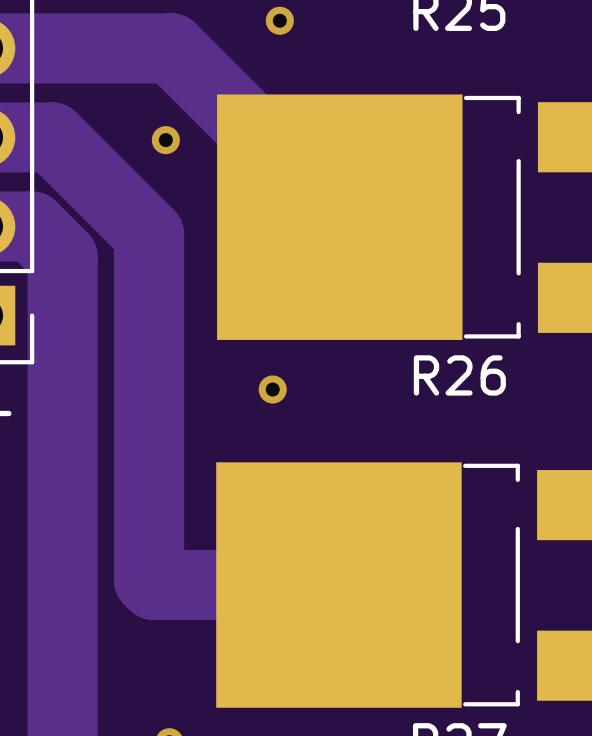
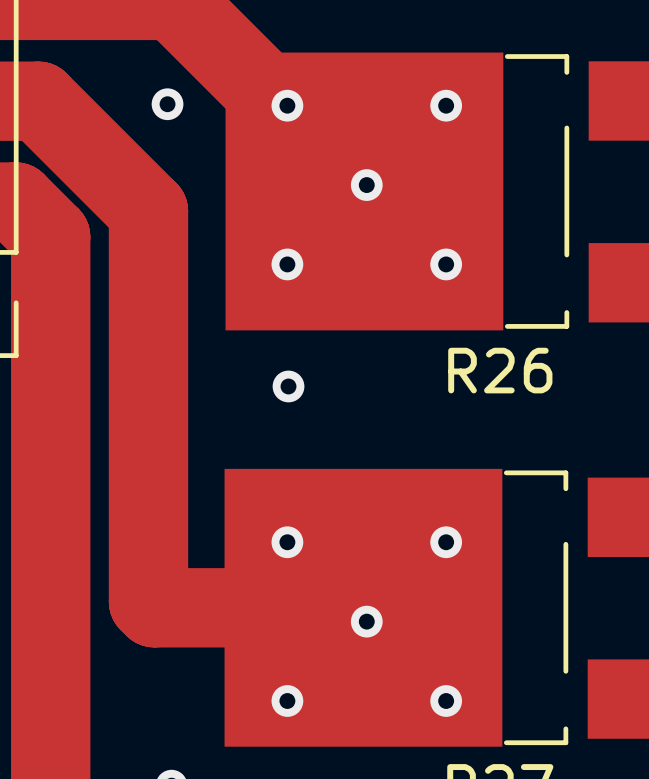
via: none -> (287, 105)
via: none -> (446, 105)
via: none -> (366, 185)
via: none -> (287, 264)
via: none -> (446, 264)
via: none -> (287, 542)
via: none -> (446, 542)
via: none -> (366, 621)
via: none -> (287, 701)
via: none -> (446, 701)

